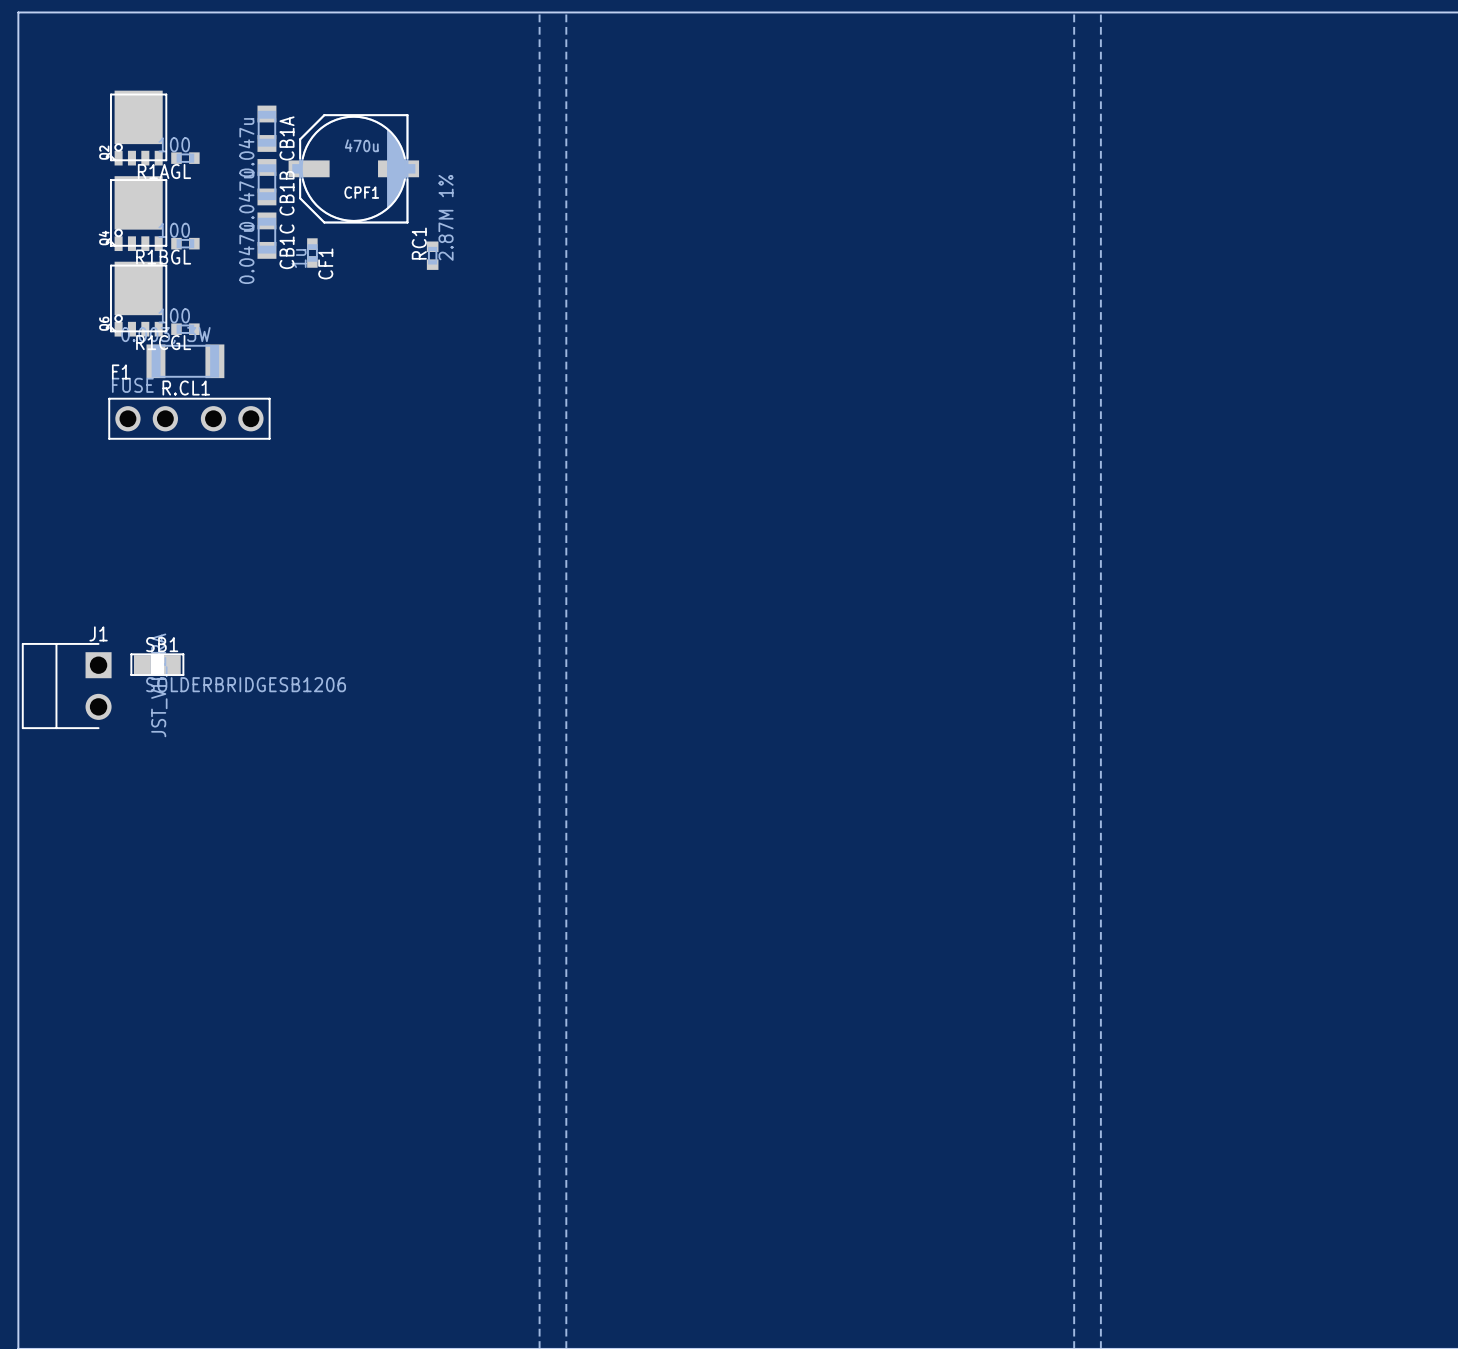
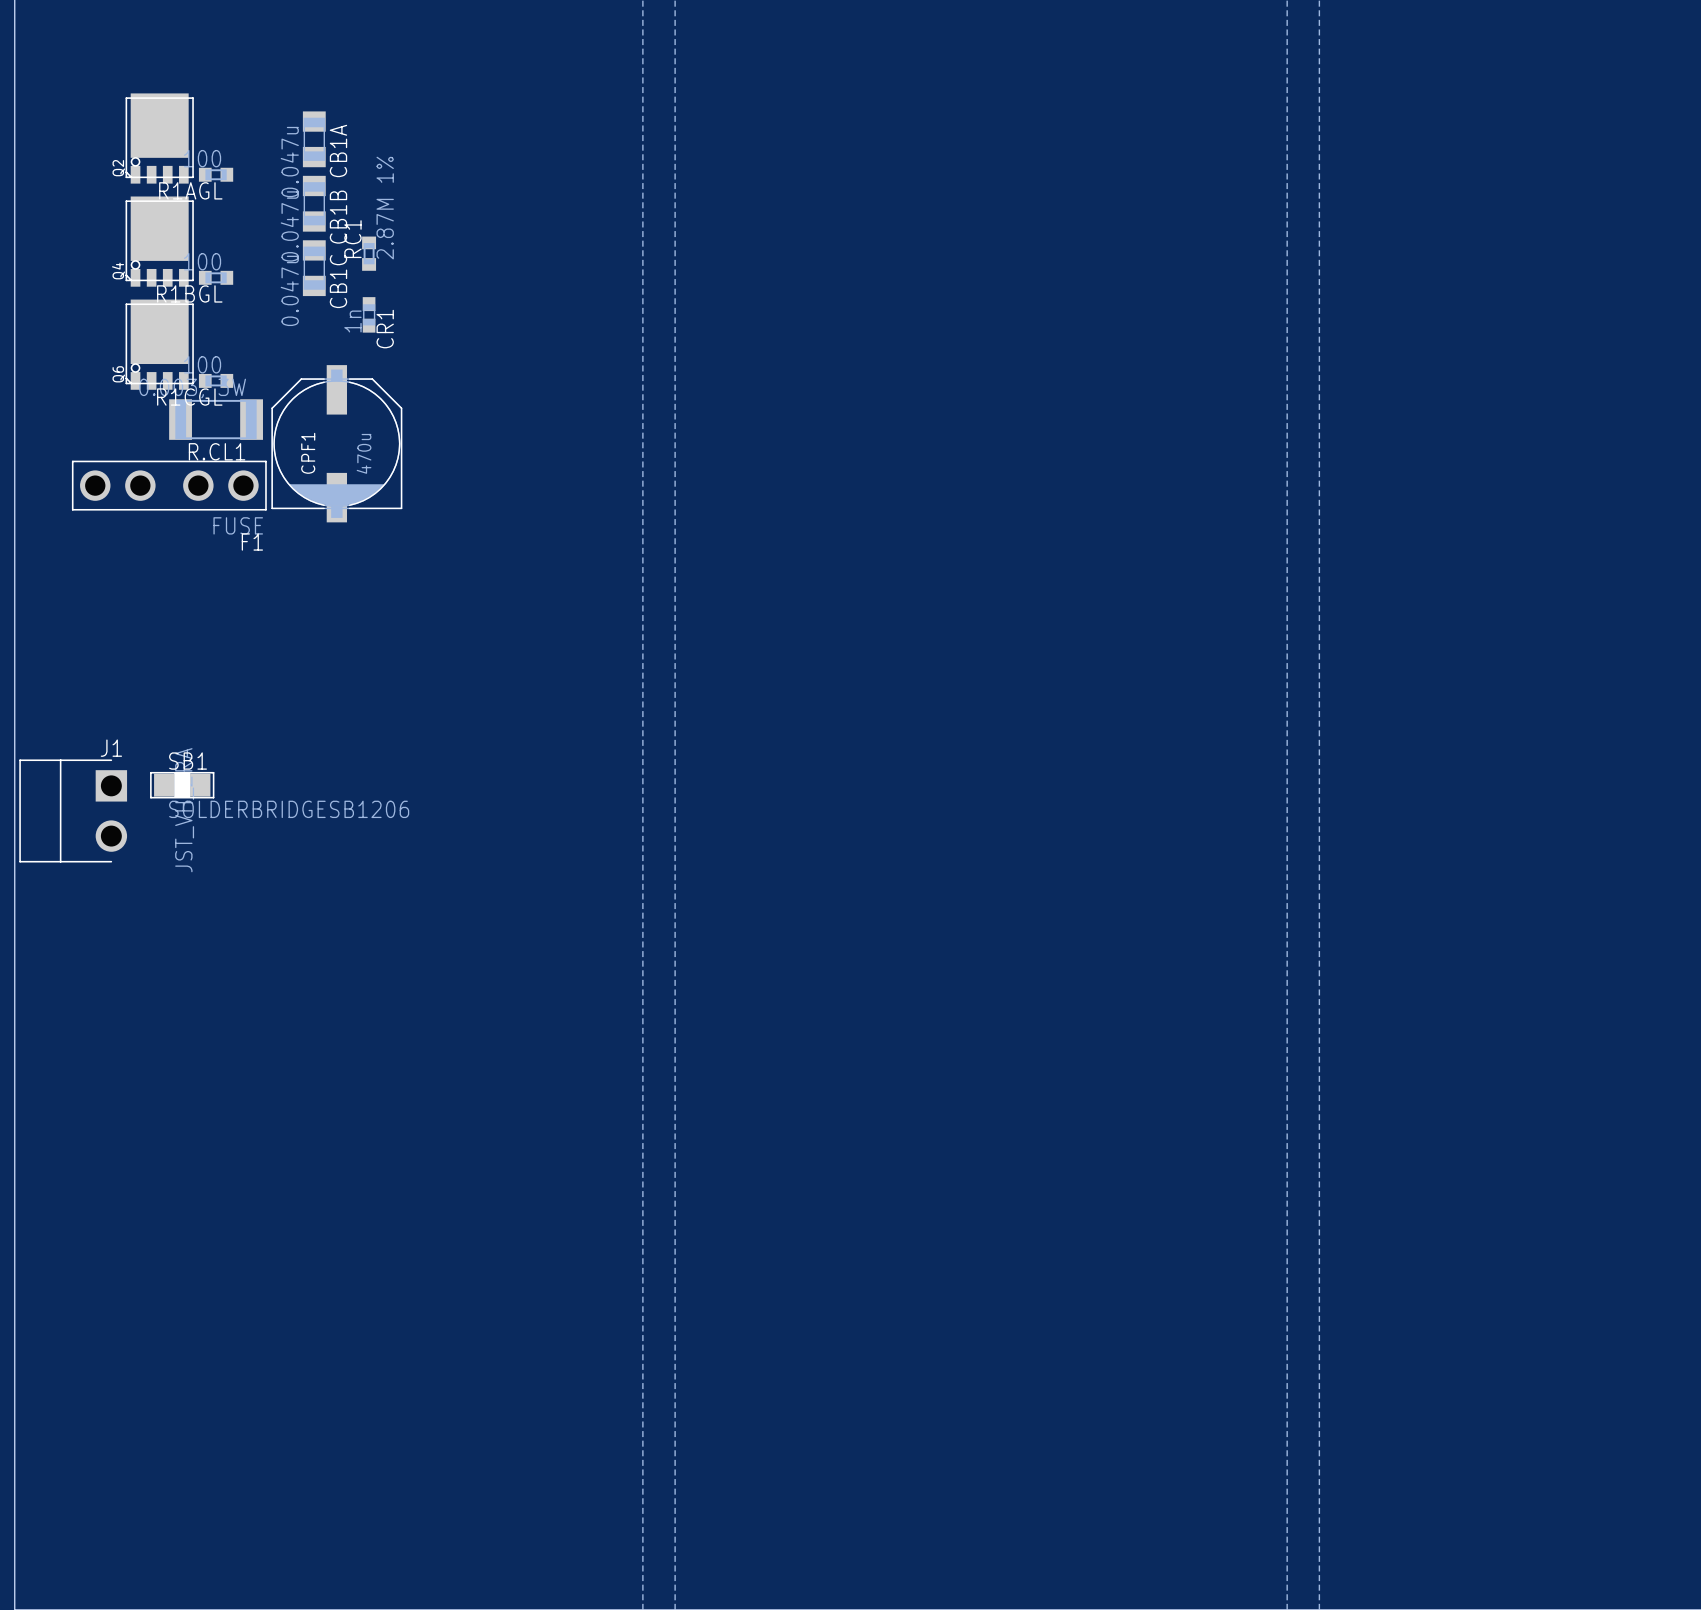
CPF1 rotation: 0° (353, 168) -> 90° clockwise (336, 443)
CPF1 position: (353, 168) -> (336, 443)
CF1: 1u (312, 253) -> none
RC1 position: (432, 255) -> (369, 253)
CR1: none -> 1n (369, 314)
F1 name position: F1 (121, 371) -> F1 (252, 541)
F1 value position: FUSE (132, 385) -> FUSE (238, 525)
F1 position: (189, 418) -> (169, 485)

